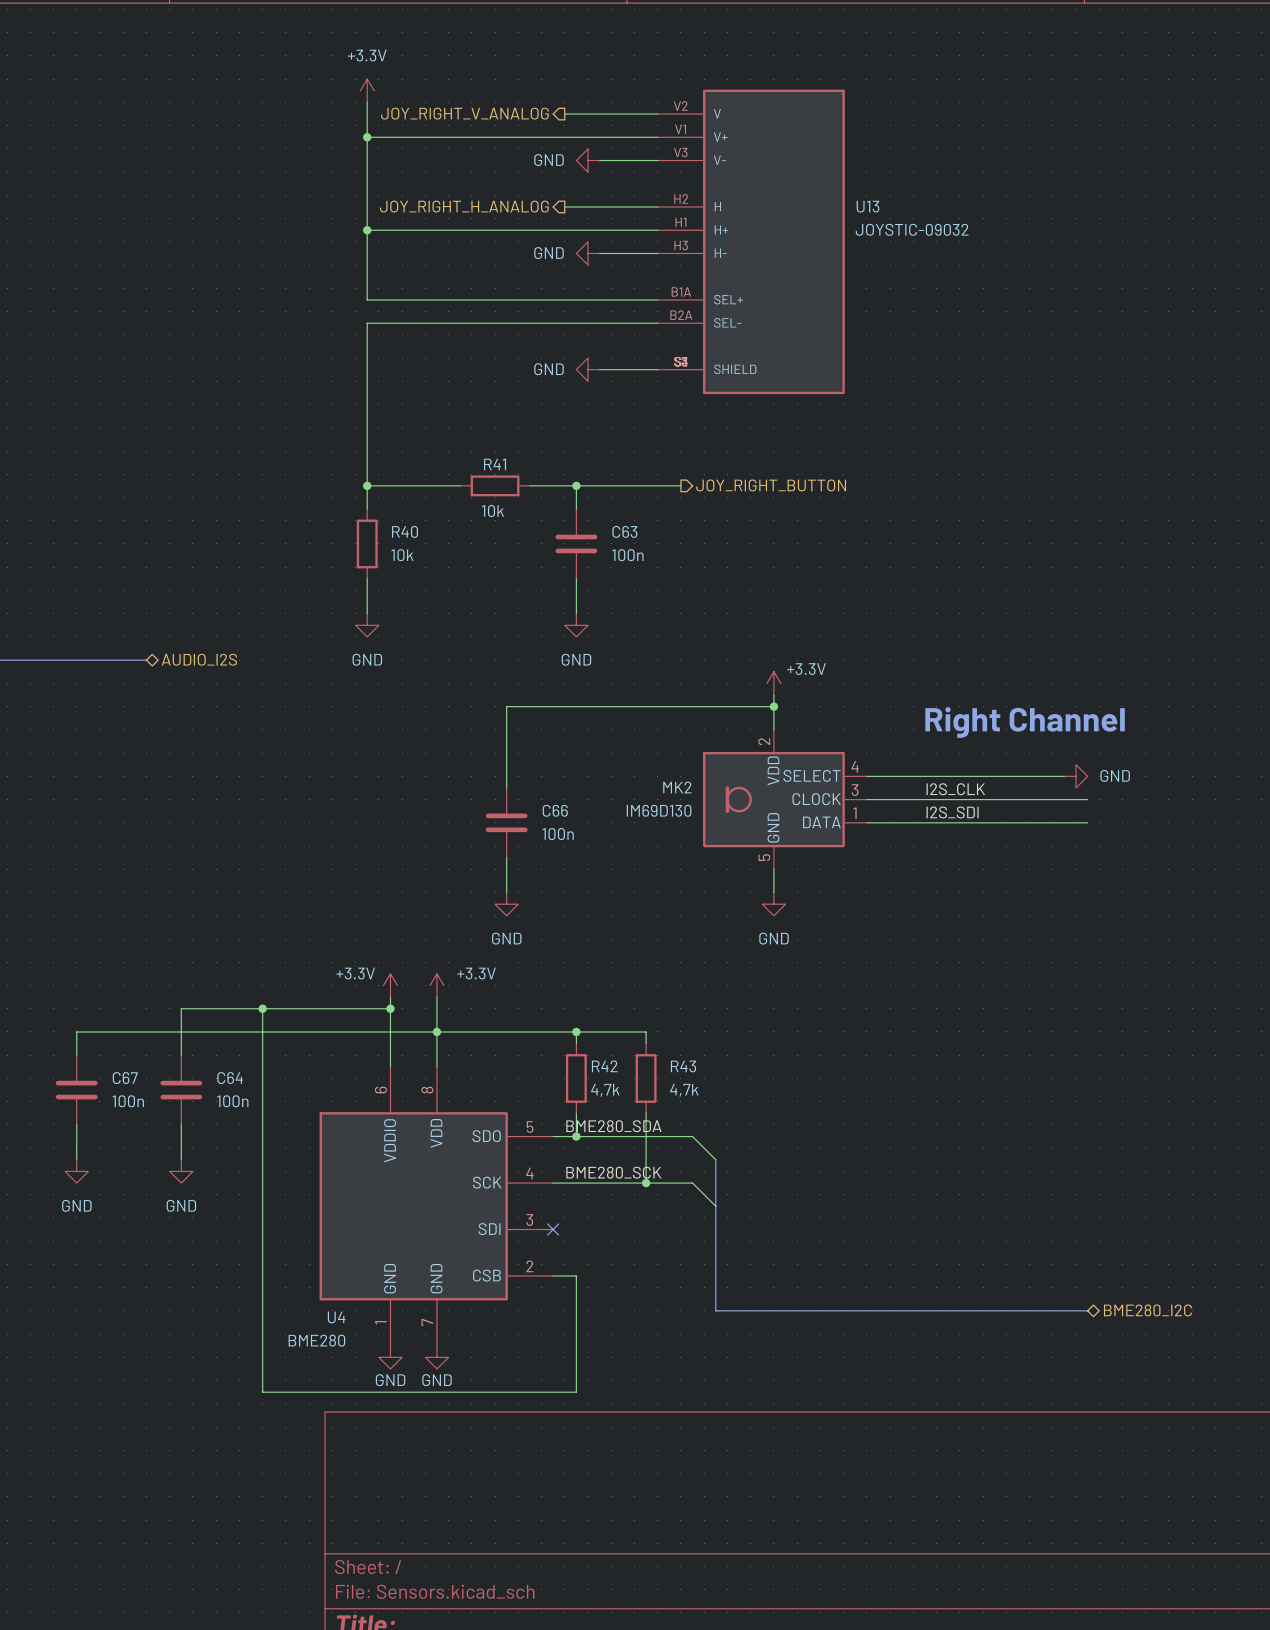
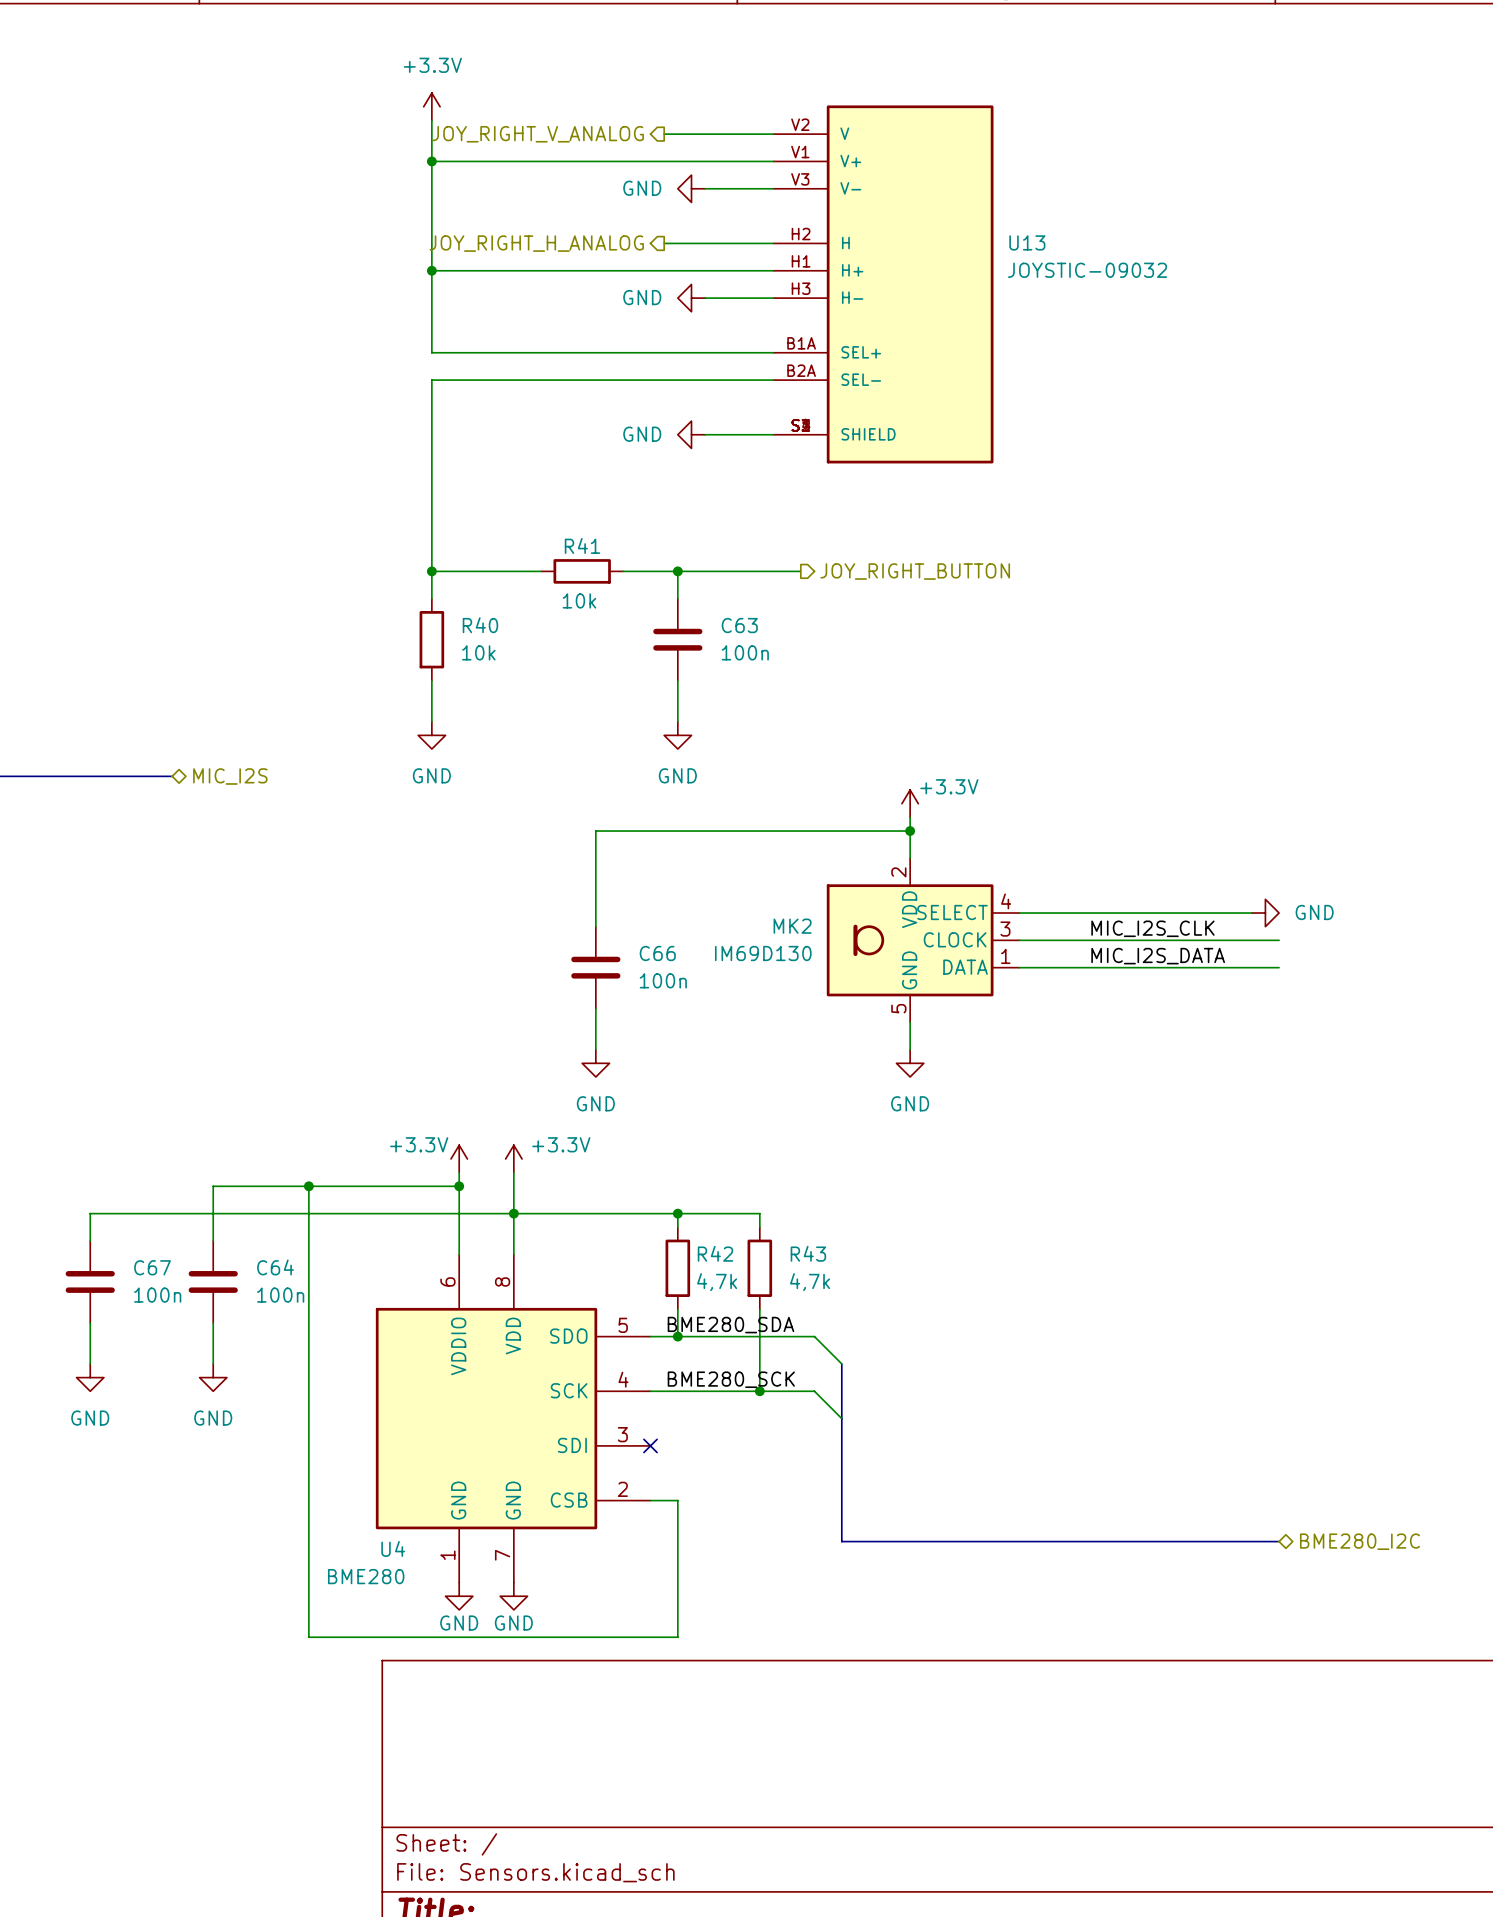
hierarchical label: AUDIO_I2S (199, 659) -> MIC_I2S (230, 776)
text: Right Channel (1025, 722) -> none
label: I2S_CLK (955, 789) -> MIC_I2S_CLK (1152, 928)
label: I2S_SDI (952, 812) -> MIC_I2S_DATA (1158, 956)

